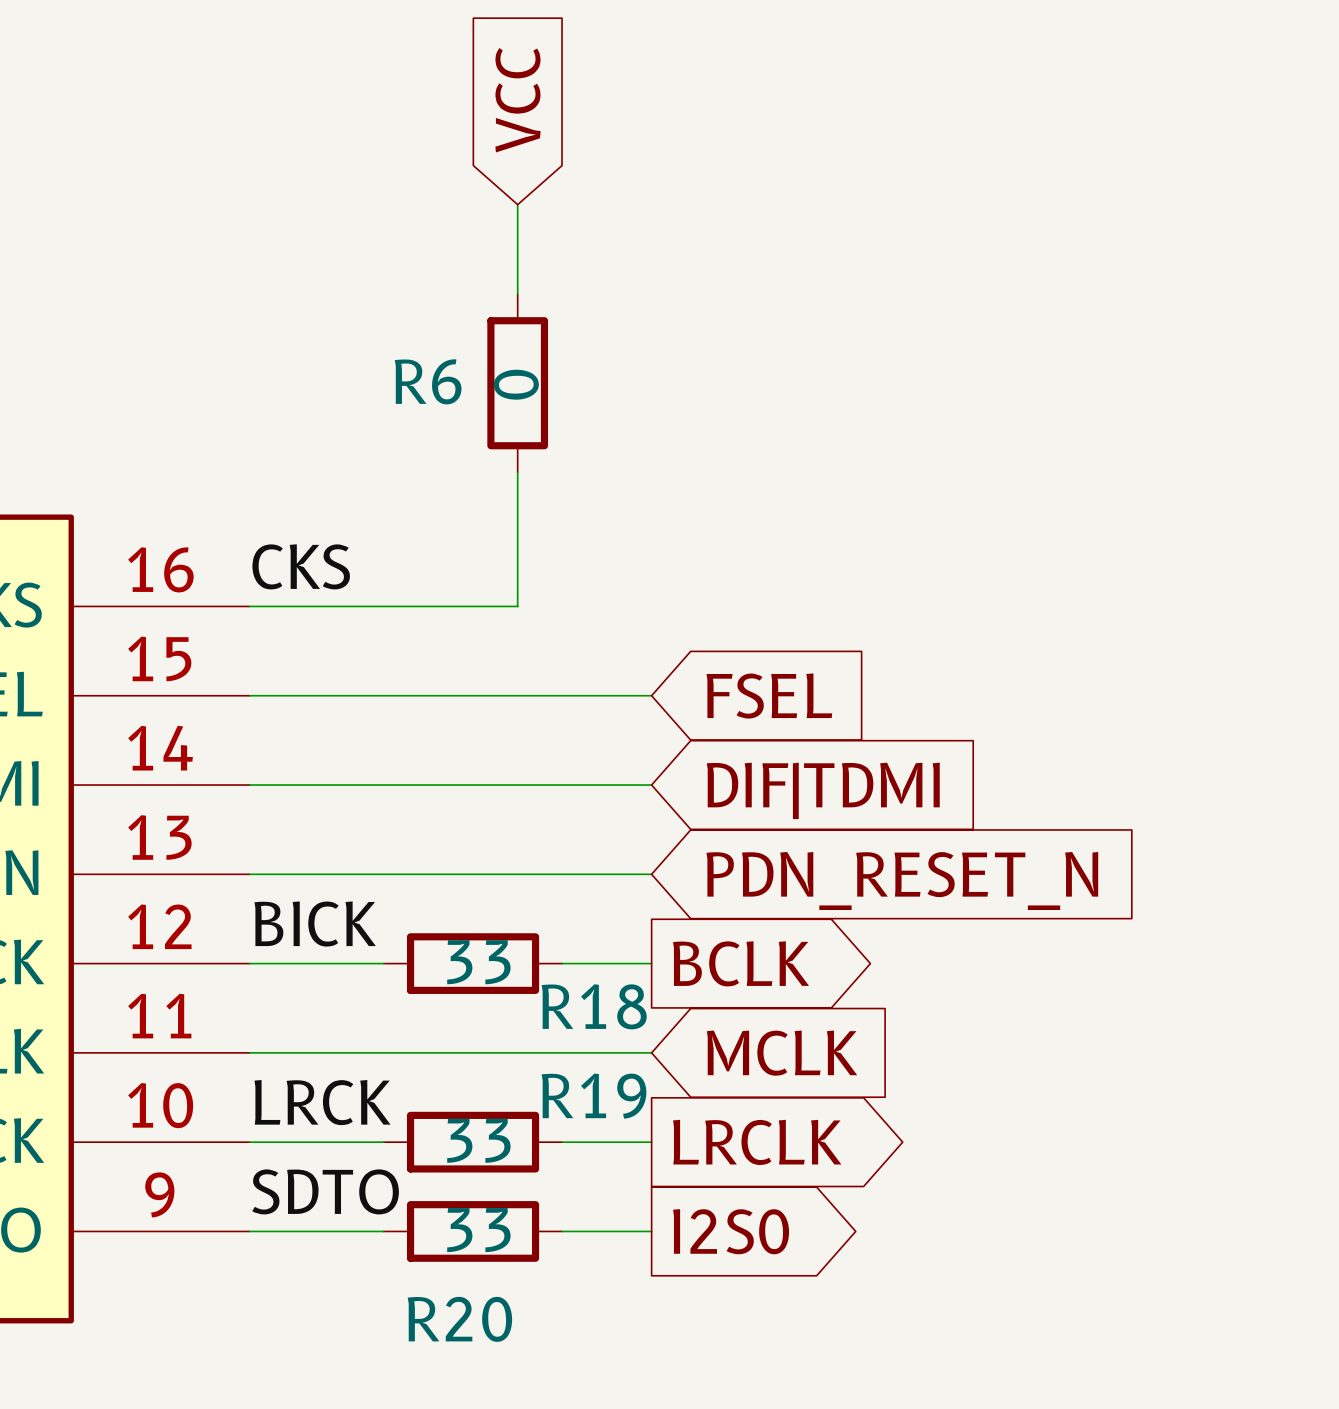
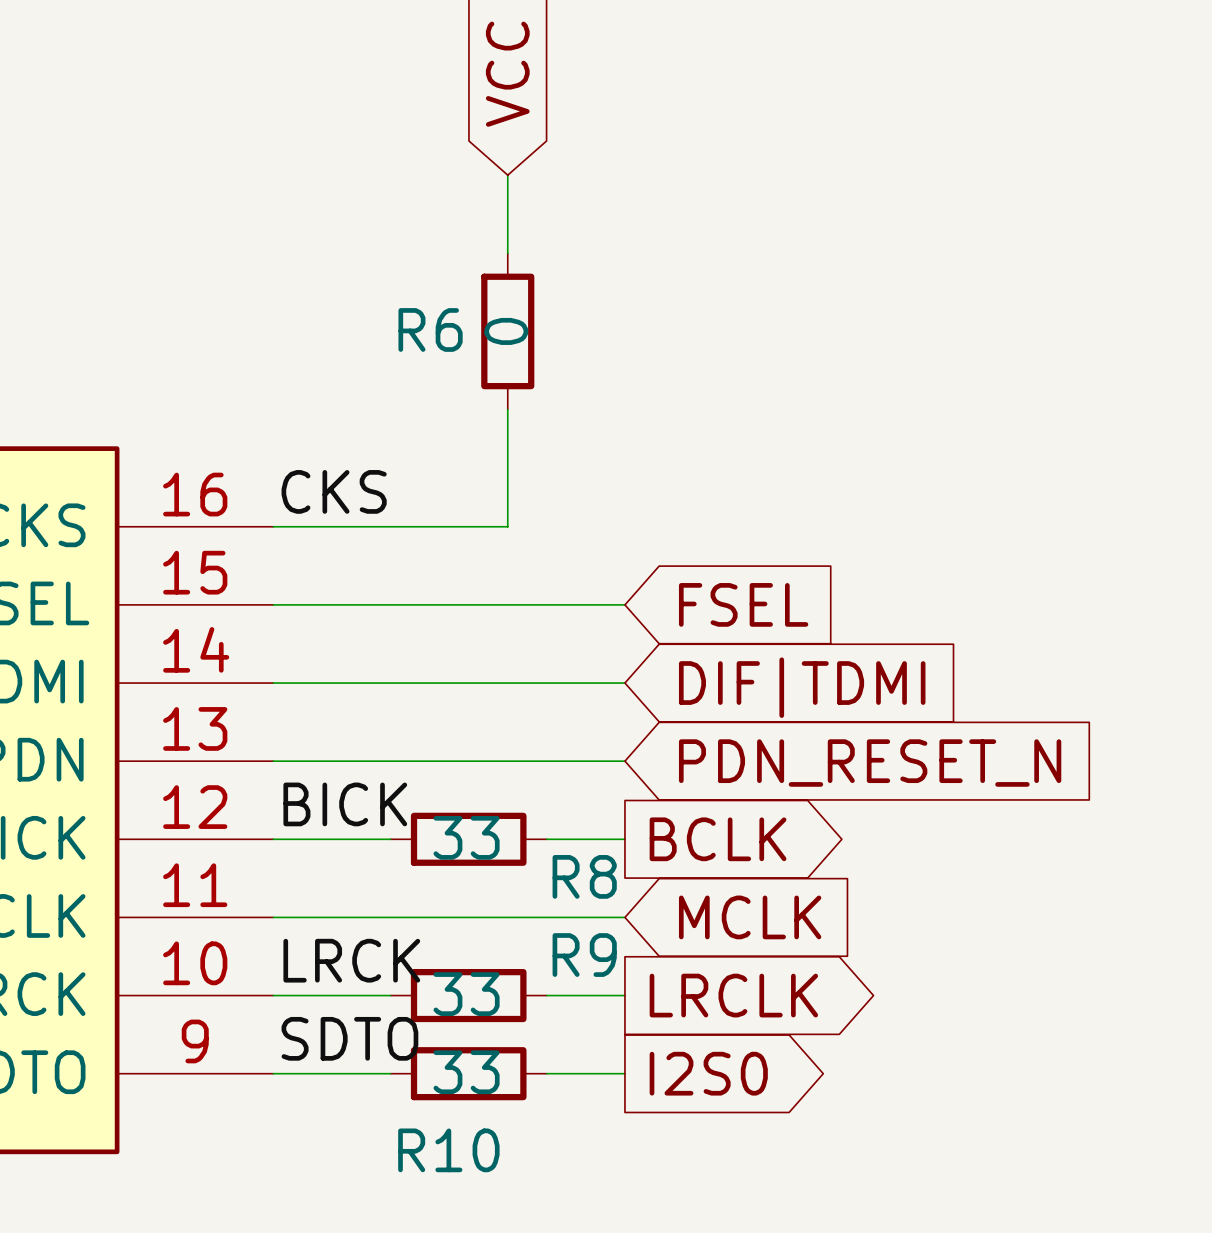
R18 name: R18 (594, 1006) -> R8 (584, 876)
R19 name: R19 (594, 1096) -> R9 (584, 955)
R20 name: R20 (459, 1319) -> R10 (448, 1150)

